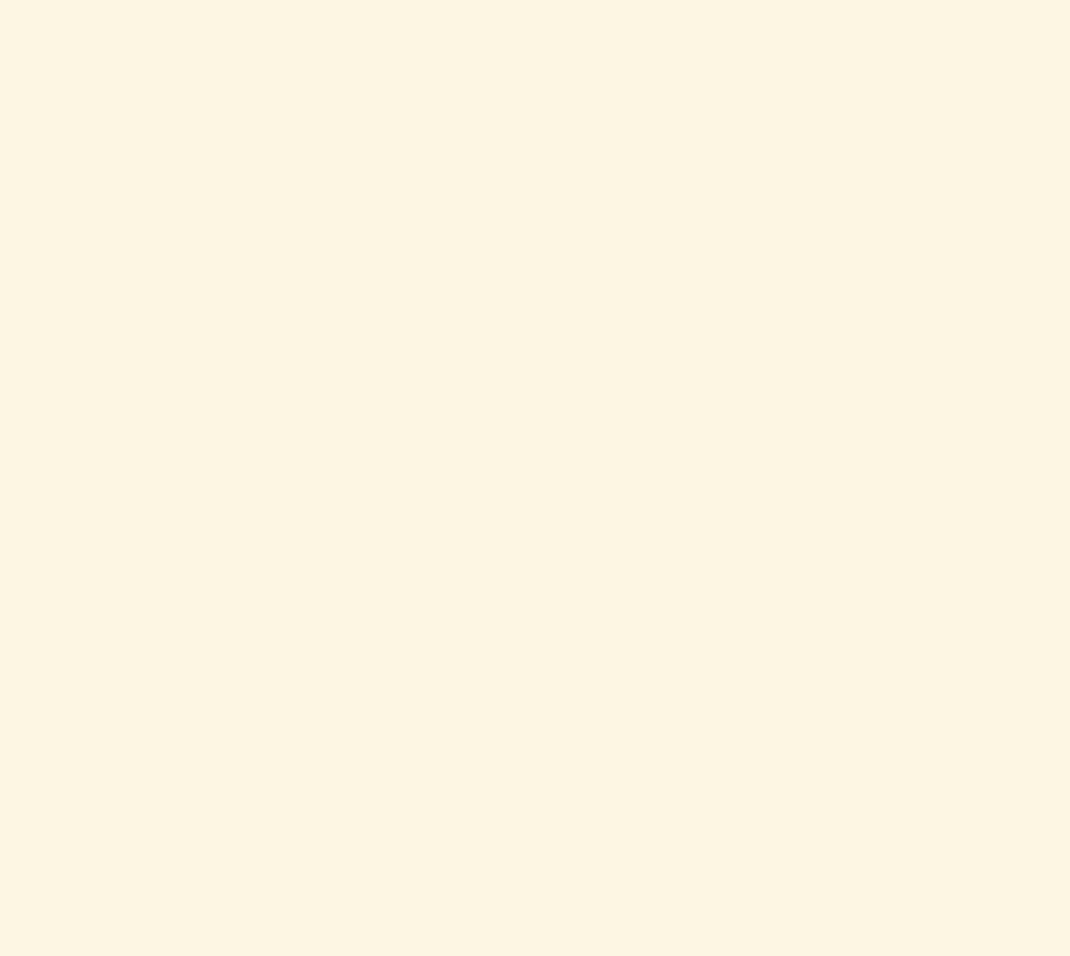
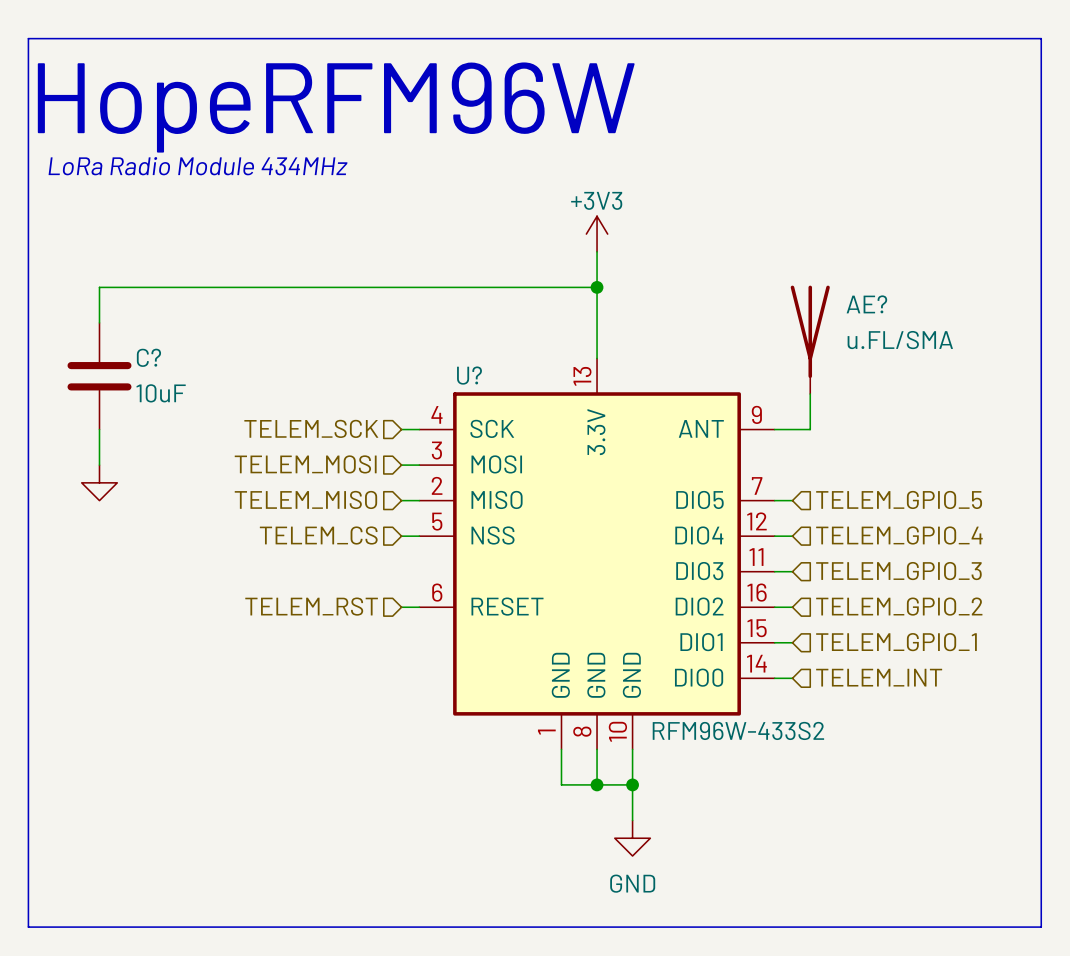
line: none -> (28, 38) (1041, 38) (1041, 927) (28, 927) (28, 38)
text: none -> HopeRFM96W (336, 107)
text: none -> LoRa Radio Module 434MHz (198, 166)
power symbol: none -> +3V3 (597, 234)
wire: none -> (597, 251) (597, 358)
wire: none -> (597, 287) (99, 287) (99, 322)
junction: none -> (597, 287)
AE?: none -> u.FL/SMA (810, 339)
C?: none -> 10uF (99, 376)
wire: none -> (810, 394) (810, 429) (774, 429)
wire: none -> (99, 429) (99, 465)
wire: none -> (401, 429) (419, 429)
hierarchical label: none -> TELEM_SCK (311, 428)
wire: none -> (401, 465) (419, 465)
hierarchical label: none -> TELEM_MOSI (305, 464)
power symbol: none -> (99, 482)
wire: none -> (401, 500) (419, 500)
wire: none -> (774, 500) (792, 500)
hierarchical label: none -> TELEM_MISO (305, 499)
hierarchical label: none -> TELEM_GPIO_5 (899, 499)
wire: none -> (401, 536) (419, 536)
wire: none -> (774, 536) (792, 536)
hierarchical label: none -> TELEM_CS (318, 535)
hierarchical label: none -> TELEM_GPIO_4 (899, 535)
U?: none -> RFM96W-433S2 (597, 553)
wire: none -> (774, 571) (792, 571)
hierarchical label: none -> TELEM_GPIO_3 (898, 571)
wire: none -> (401, 607) (419, 607)
wire: none -> (774, 607) (792, 607)
hierarchical label: none -> TELEM_RST (311, 606)
hierarchical label: none -> TELEM_GPIO_2 (899, 606)
wire: none -> (774, 642) (792, 642)
hierarchical label: none -> TELEM_GPIO_1 (896, 642)
wire: none -> (774, 678) (792, 678)
hierarchical label: none -> TELEM_INT (879, 677)
wire: none -> (561, 749) (561, 784) (632, 784)
wire: none -> (597, 749) (597, 784)
wire: none -> (632, 749) (632, 820)
junction: none -> (597, 784)
junction: none -> (632, 784)
power symbol: none -> GND (632, 838)

